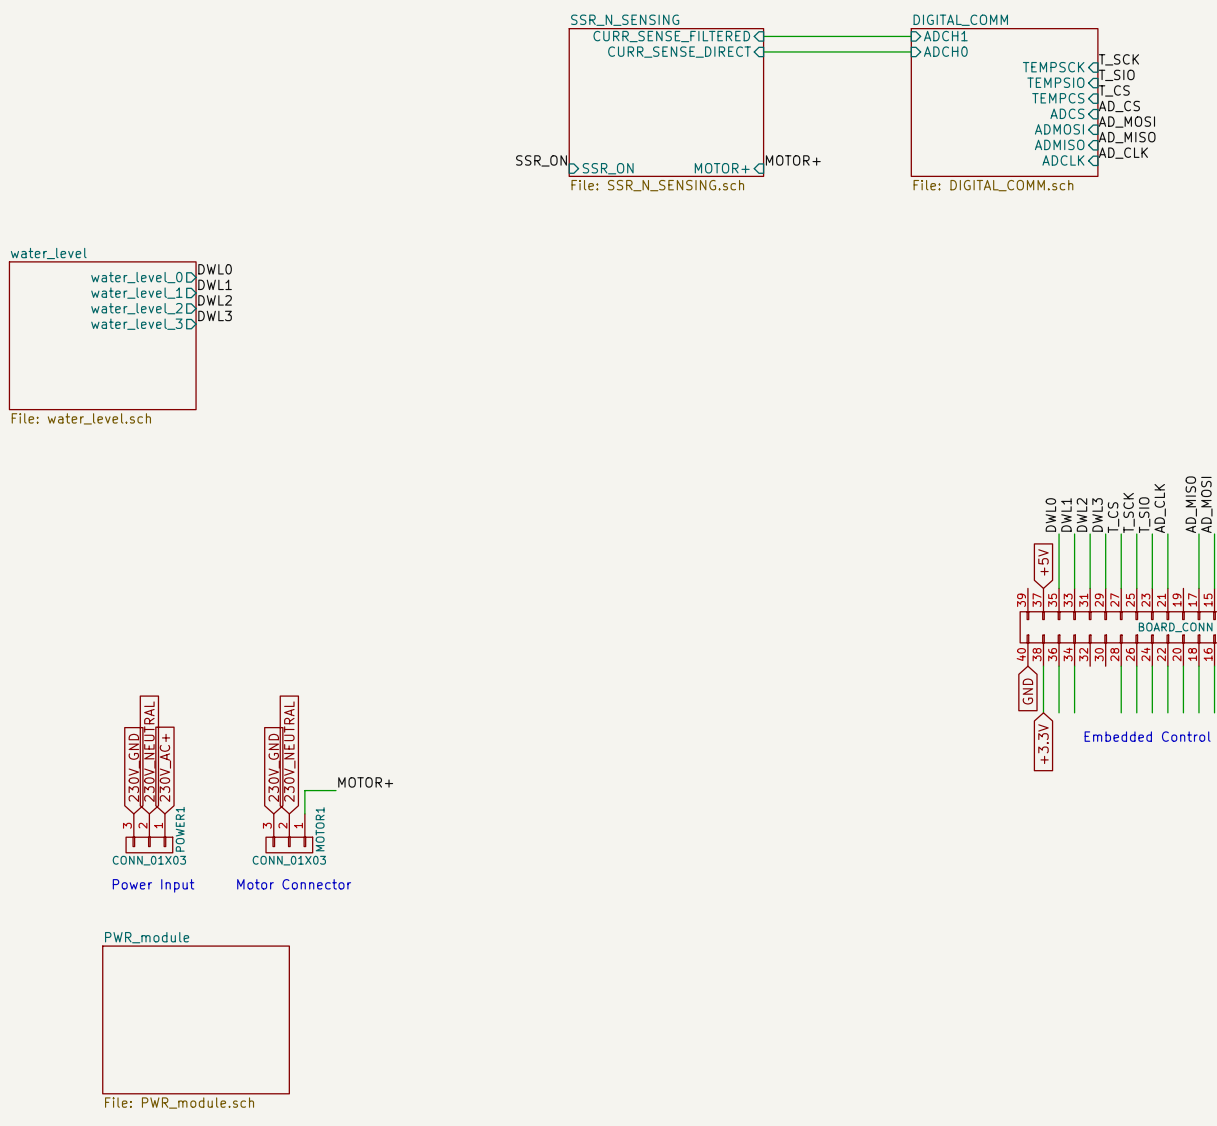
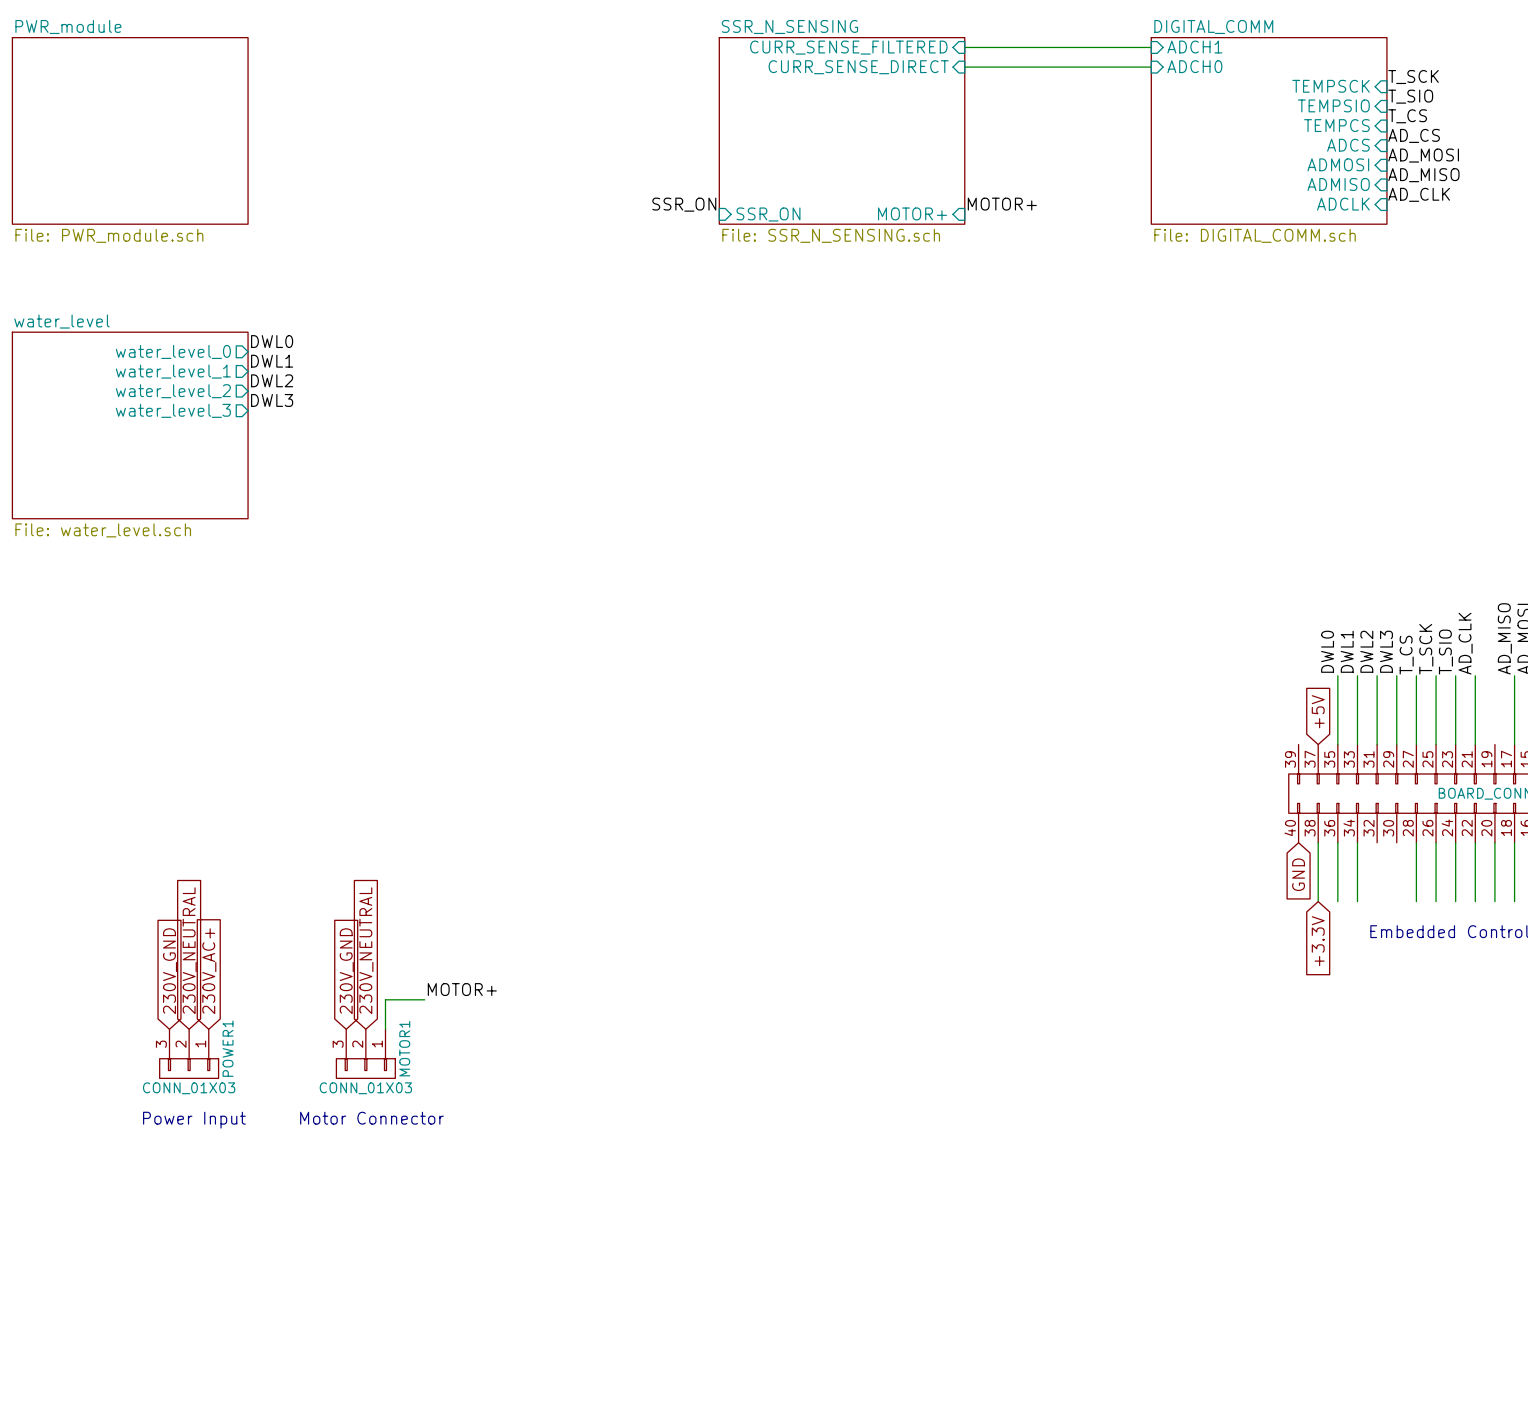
sheet PWR_module: none -> File: PWR_module.sch (130, 130)
sheet PWR_module: File: PWR_module.sch (196, 1019) -> none

